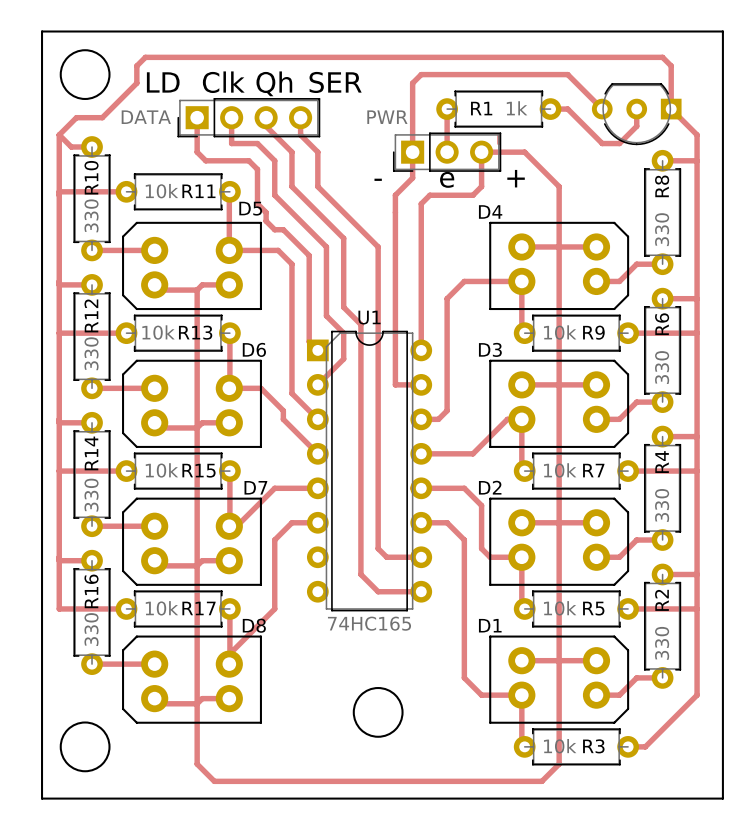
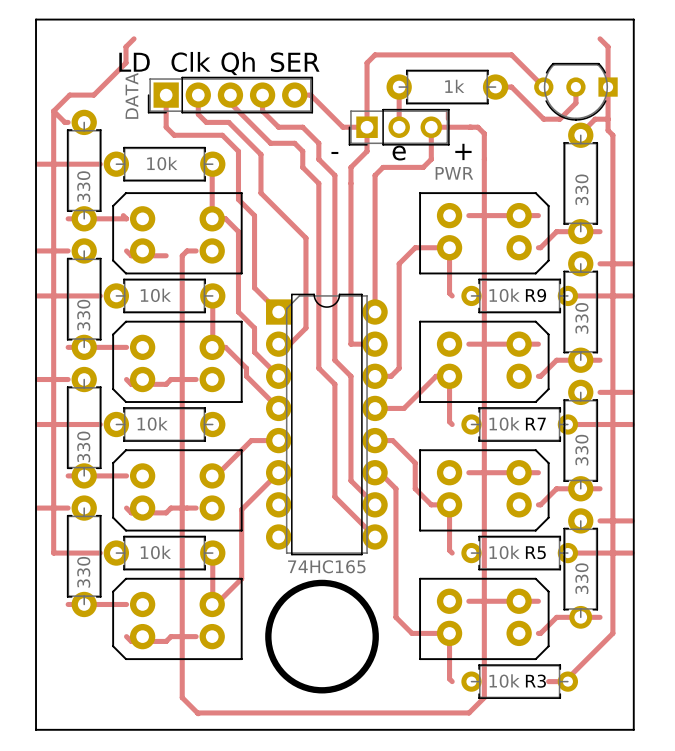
round board edge: [59, 49, 111, 100] -> none
track: (662, 57) (145, 57) (136, 65) (136, 83) (102, 117) -> (134, 38) (125, 46) (125, 62) (93, 95) (77, 95)
R1: 1k (498, 109) -> none
part: none -> 1k (447, 87)
track: (671, 109) (697, 134) (697, 695) (645, 746) (628, 746) -> (608, 87) (608, 130) (612, 135) (612, 633) (564, 681) (548, 681)
track: (93, 117) (76, 117) (59, 134) -> (69, 95) (53, 111)
part: DATA (248, 117) -> none
part: none -> DATA (230, 95)
track: none -> (294, 95) (310, 95) (342, 127) (367, 127)
part value position: PWR (387, 117) -> PWR (454, 173)
track: (59, 134) (71, 146) (88, 146) -> (53, 111) (64, 122)
track: (59, 134) (59, 608) (76, 608) -> (53, 111) (53, 553)
track: (231, 138) (231, 143) (257, 143) (274, 160) (274, 178) -> (214, 135) (222, 135) (238, 151)
track: none -> (608, 119) (595, 119) (580, 135)
track: (291, 152) (291, 186) (343, 238) (343, 307) (360, 324) -> (254, 127) (270, 143) (294, 143) (302, 151) (302, 167) (318, 183) (318, 287)
track: (317, 152) (317, 186) (378, 246) -> (278, 127) (302, 127) (318, 143) (318, 159) (334, 175) (334, 215)
track: (524, 152) (559, 186) (559, 764) (541, 781) (214, 781) (197, 764) (197, 290) (202, 284) (219, 284) -> (471, 127) (477, 127) (484, 133) (484, 697) (469, 712) (197, 712)
track: (248, 160) (257, 169) (257, 203) (266, 212) (266, 221) (274, 229) (283, 229) (309, 255) (309, 341) -> none
track: (662, 160) (697, 160) -> none
R11: 10k (178, 191) -> none
part: none -> 10k (164, 164)
track: (229, 191) (229, 250) (246, 250) -> (212, 164) (212, 218)
track: (274, 195) (326, 246) (326, 315) (343, 333) (343, 359) (317, 384) -> (198, 114) (206, 122) (228, 122) (260, 154) (260, 193) (305, 238) (305, 328) (289, 344) (278, 344)
R10: 330 (92, 198) -> none
part: none -> 330 (84, 170)
part: none -> 330 (580, 183)
R8: 330 (662, 212) -> none
track: (260, 250) (278, 250) (291, 264) -> (238, 167) (238, 199) (254, 215) (254, 231)
track: none -> (225, 218) (238, 231) (238, 312) (254, 328)
track: (636, 264) (619, 281) (598, 281) -> (575, 231) (556, 231) (540, 247)
D5: (191, 265) -> none
part: none -> (177, 233)
part: none -> (484, 233)
D4: (559, 265) -> none
track: (501, 281) (521, 281) (521, 330) (524, 333) -> (449, 247) (449, 293) (452, 295)
track: none -> (187, 250) (182, 255) (182, 697) (198, 713)
track: (291, 324) (291, 367) -> (254, 287) (270, 303)
R13: 10k (178, 333) -> none
part: none -> 10k (164, 295)
track: (229, 333) (229, 388) (246, 388) -> (212, 295) (212, 347)
R12: 330 (92, 336) -> none
part: none -> 330 (84, 299)
part: none -> 330 (580, 312)
R6: 330 (662, 350) -> none
track: (378, 402) (378, 427) -> (318, 368) (334, 384)
track: none -> (334, 360) (350, 376) (350, 480) (375, 504)
track: (636, 402) (619, 419) (598, 419) -> (575, 360) (556, 360) (540, 376)
D6: (191, 403) -> none
part: none -> (177, 361)
part: none -> (484, 361)
D3: (559, 403) -> none
track: (360, 410) (360, 574) (378, 591) (421, 591) -> none
track: (452, 453) (472, 453) (507, 419) (521, 419) (521, 468) (524, 471) -> (403, 408) (436, 376) (449, 376) (449, 421) (452, 424)
R15: 10k (178, 471) -> none
part: none -> 10k (164, 424)
track: (229, 471) (229, 526) (236, 526) (274, 488) (288, 488) -> (215, 475) (251, 440)
U1: 74HC165 (369, 471) -> none
part: none -> 74HC165 (326, 424)
R14: 330 (92, 474) -> none
part: none -> 330 (84, 427)
track: (440, 488) (464, 488) (481, 505) (481, 548) (490, 557) -> (392, 440) (415, 463) (415, 488) (431, 504) (439, 504)
part: none -> 330 (580, 440)
R4: 330 (662, 488) -> none
track: (317, 522) (291, 522) (274, 540) (274, 608) (229, 654) (229, 664) (229, 663) (229, 608) -> (278, 472) (241, 509) (241, 578) (215, 604) (212, 604)
track: (421, 522) (447, 522) (464, 540) (464, 677) (481, 695) -> (379, 472) (395, 488) (395, 617) (412, 633) (431, 633)
track: (636, 540) (619, 557) (598, 557) -> (575, 488) (556, 488) (540, 504)
D7: (191, 541) -> none
part: none -> (177, 490)
part: none -> (484, 490)
D2: (559, 541) -> none
track: (386, 557) (421, 557) -> (342, 504) (375, 536)
track: (501, 557) (521, 557) (521, 606) (524, 608) -> (449, 504) (449, 550) (452, 553)
R17: 10k (178, 608) -> none
part: none -> 10k (164, 553)
track: none -> (212, 553) (212, 604)
R16: 330 (92, 612) -> none
part: none -> 330 (84, 556)
part: none -> 330 (580, 568)
R2: 330 (662, 626) -> none
round board edge: none -> [265, 579, 379, 694]
track: (636, 677) (619, 695) (598, 695) -> (575, 617) (556, 617) (540, 633)
D8: (191, 679) -> none
part: none -> (177, 618)
part: none -> (484, 618)
D1: (559, 679) -> none
round board edge: [352, 687, 404, 738] -> none
track: (501, 695) (521, 695) (521, 744) (524, 746) -> (449, 633) (449, 678) (452, 681)
round board edge: [59, 721, 111, 773] -> none
board edge: (57, 798) (42, 798) (42, 31) (722, 31) (722, 798) (698, 798) -> (36, 729) (36, 19) (633, 19) (633, 729)

